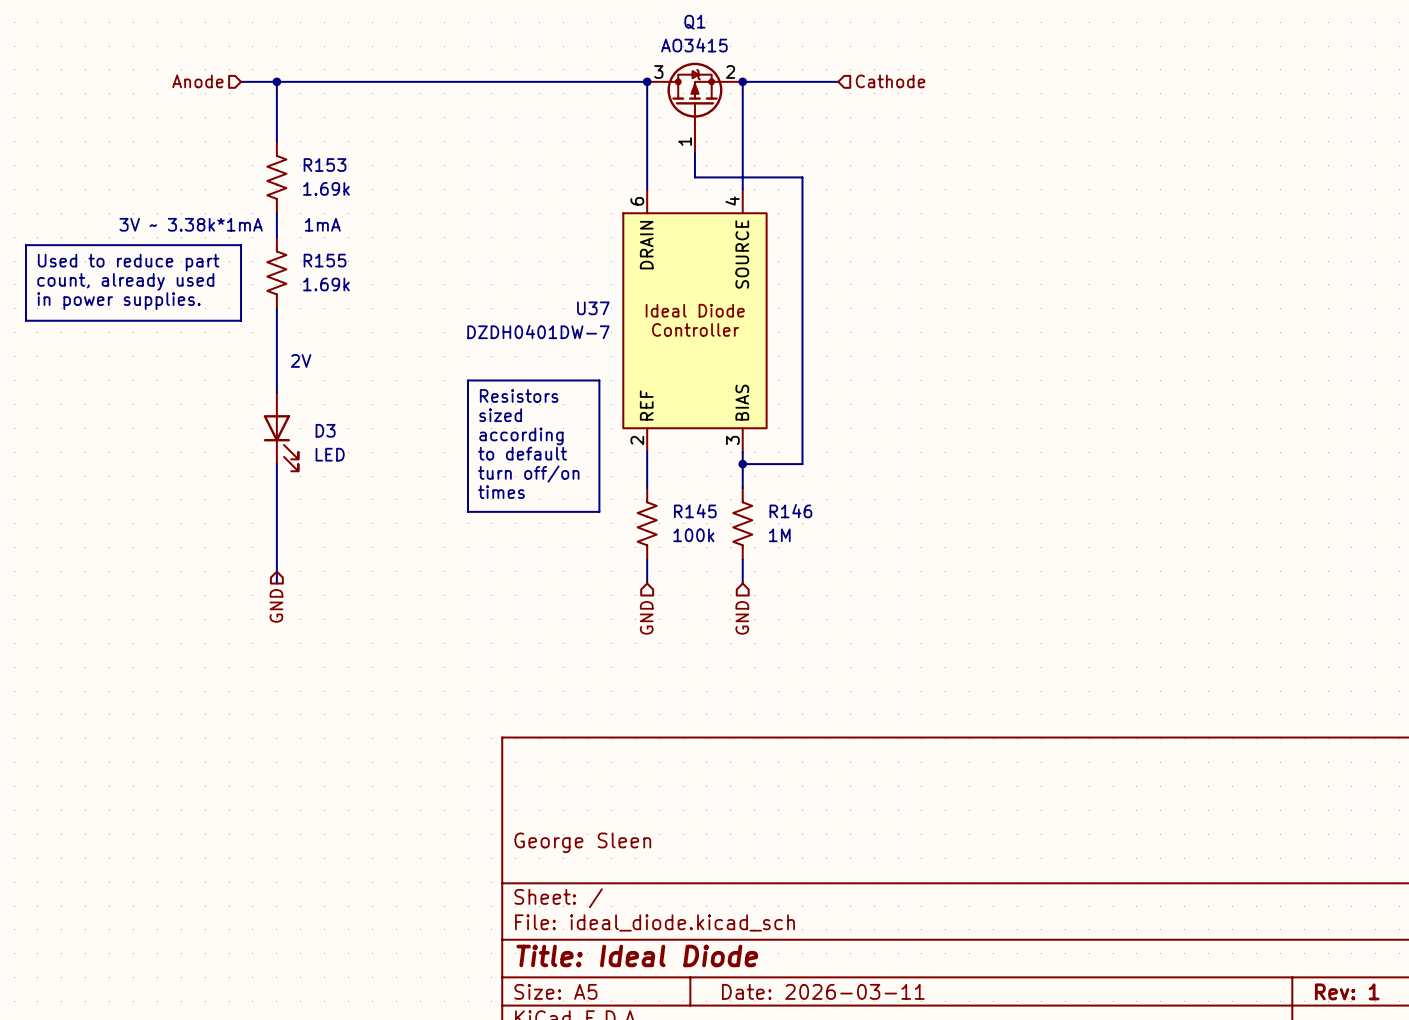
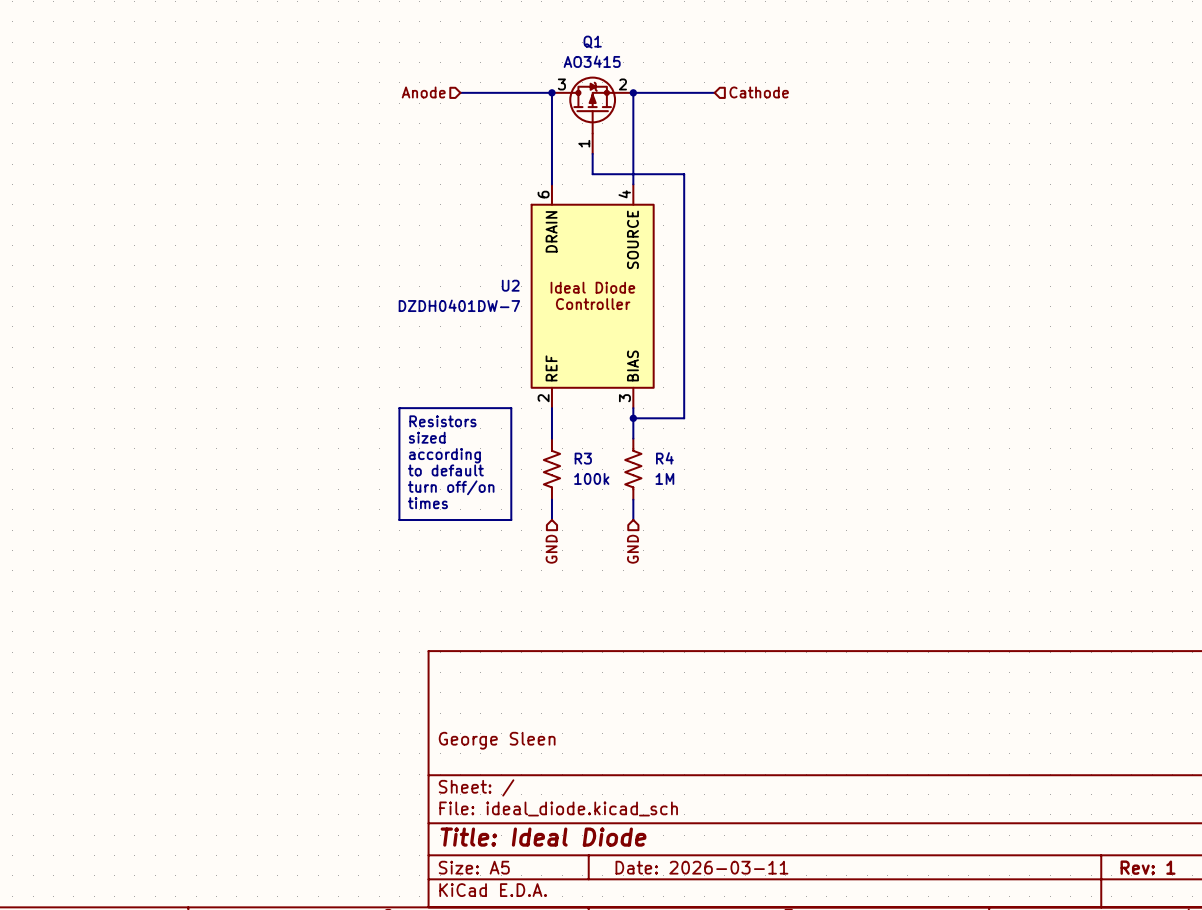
hierarchical label: Anode (197, 81) -> none
wire: (241, 81) (539, 81) -> none
wire: (276, 81) (276, 141) -> none
junction: (276, 81) -> none
hierarchical label: none -> Anode (423, 92)
R153: 1.69k (276, 177) -> none
wire: (276, 213) (276, 237) -> none
text: 3V ~ 3.38k*1mA (191, 224) -> none
text: 1mA (322, 224) -> none
line: (26, 245) (241, 245) (241, 320) (26, 320) (26, 245) -> none
text: Used to reduce part (128, 262) -> none
R155: 1.69k (276, 272) -> none
text: count, already used (125, 281) -> none
text: in power supplies. (118, 301) -> none
wire: (276, 308) (276, 392) -> none
U37 name: U37 (593, 308) -> U2 (510, 285)
text: 2V (301, 360) -> none
text position: Resistors (519, 395) -> Resistors (442, 421)
text position: sized (500, 415) -> sized (427, 437)
D3: LED (281, 431) -> none
text position: according (521, 436) -> according (444, 455)
line: (468, 452) (468, 380) (599, 380) (599, 452) -> (399, 408) (511, 408)
text position: to default (522, 453) -> to default (445, 470)
wire: (276, 464) (276, 583) -> none
text position: turn off/on (528, 474) -> turn off/on (451, 487)
text position: times (501, 492) -> times (427, 503)
line: (468, 511) (599, 511) -> (399, 458) (399, 520) (511, 520) (511, 458)
R145 name: R145 (695, 511) -> R3 (583, 458)
R146 name: R146 (790, 511) -> R4 (664, 458)
hierarchical label: GND (276, 605) -> none

